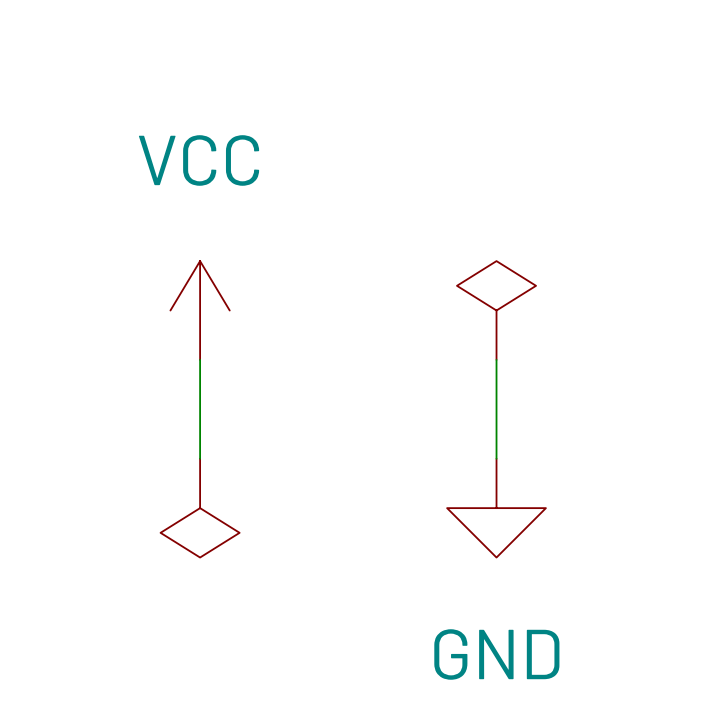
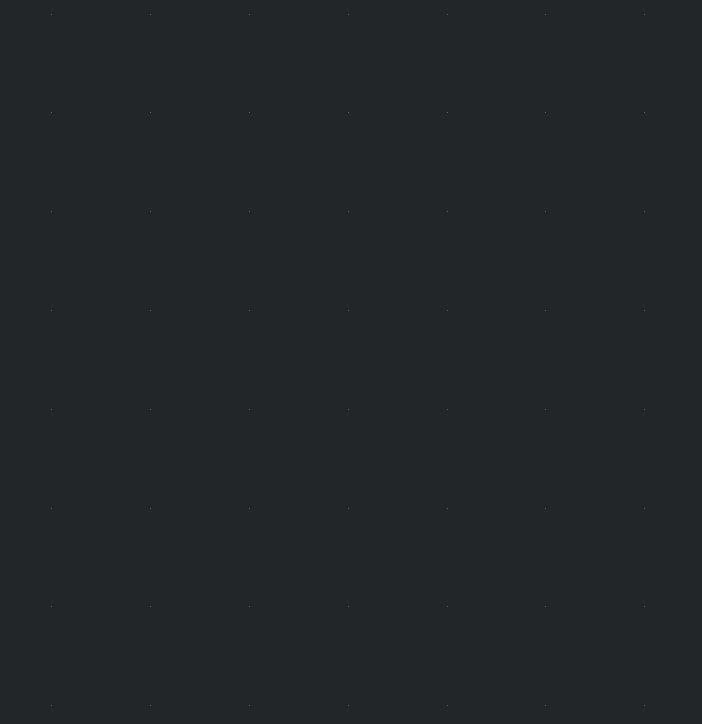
power symbol: VCC (200, 310) -> none
power symbol: (496, 310) -> none
wire: (200, 359) (200, 458) -> none
wire: (496, 359) (496, 458) -> none
power symbol: (200, 508) -> none
power symbol: GND (496, 508) -> none

